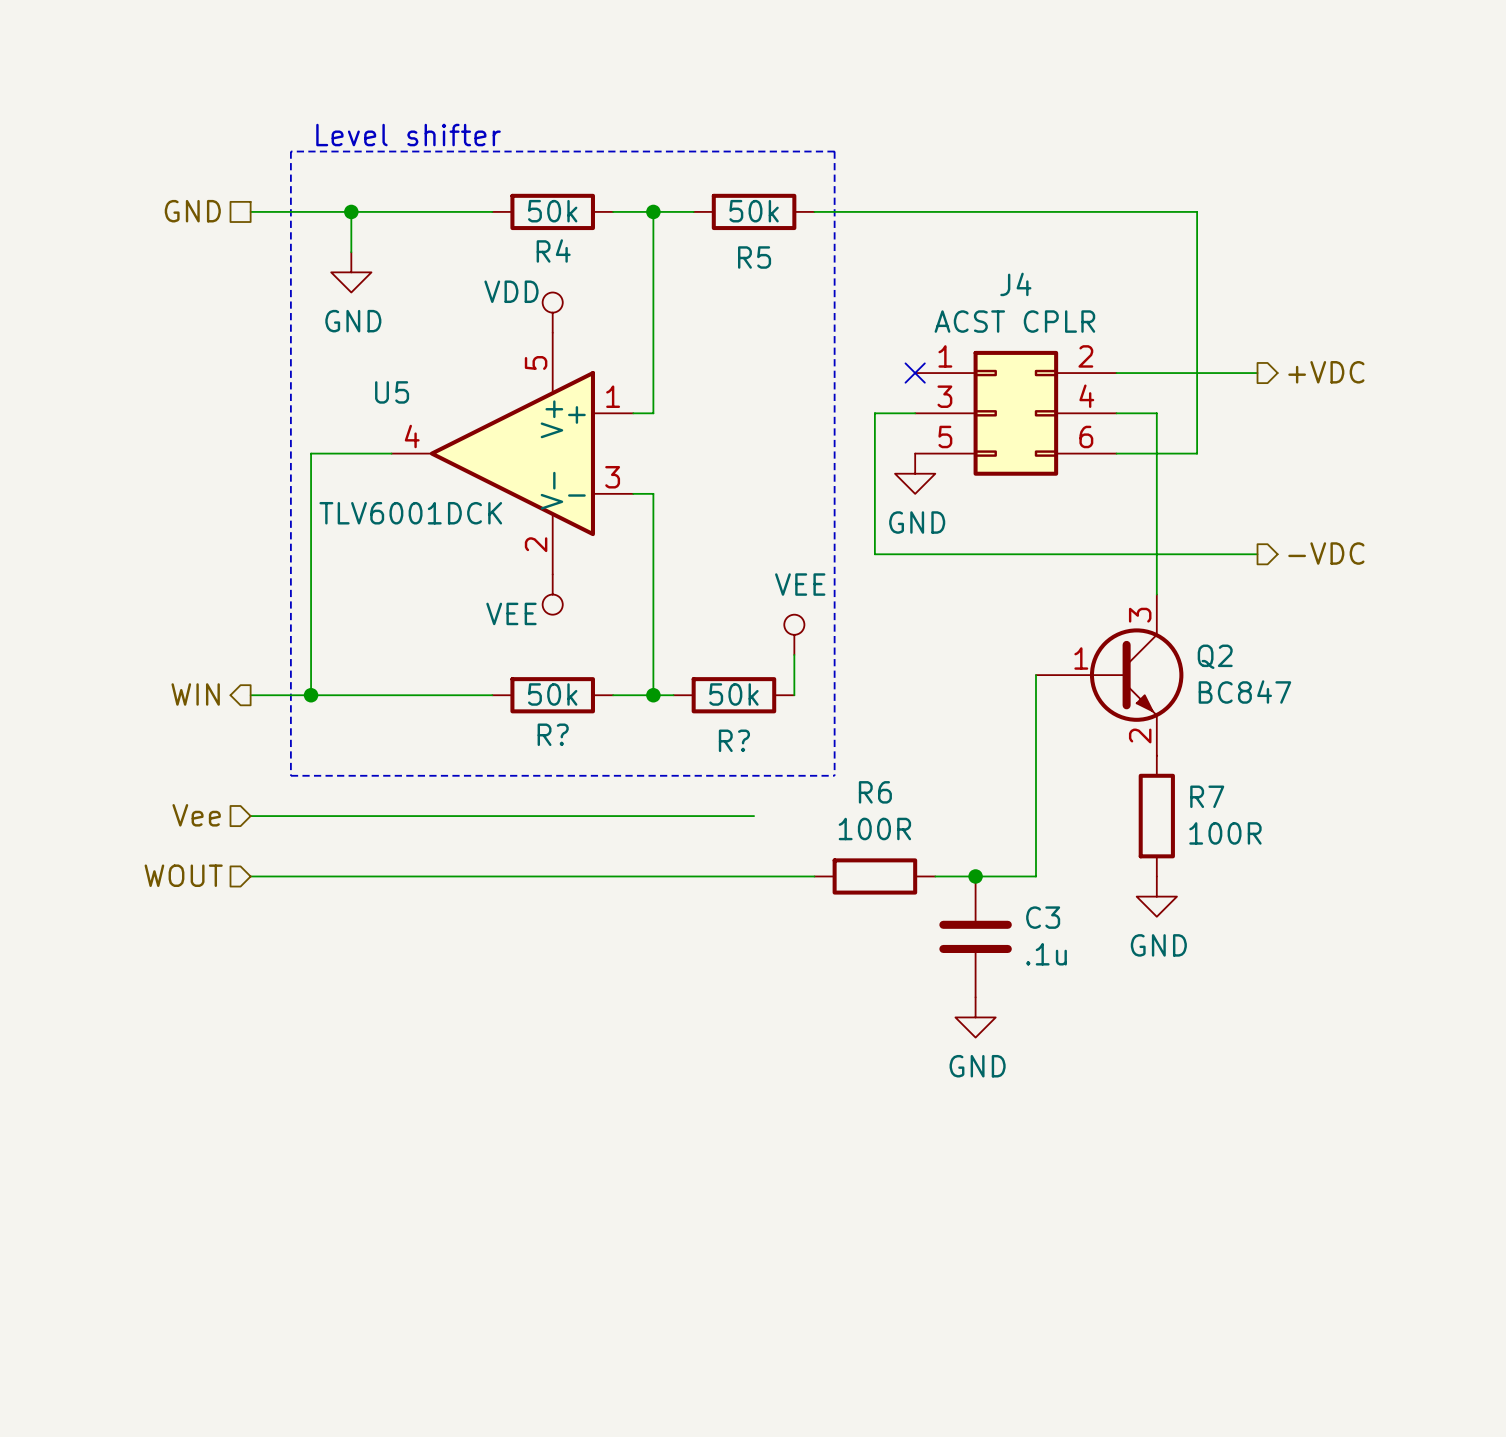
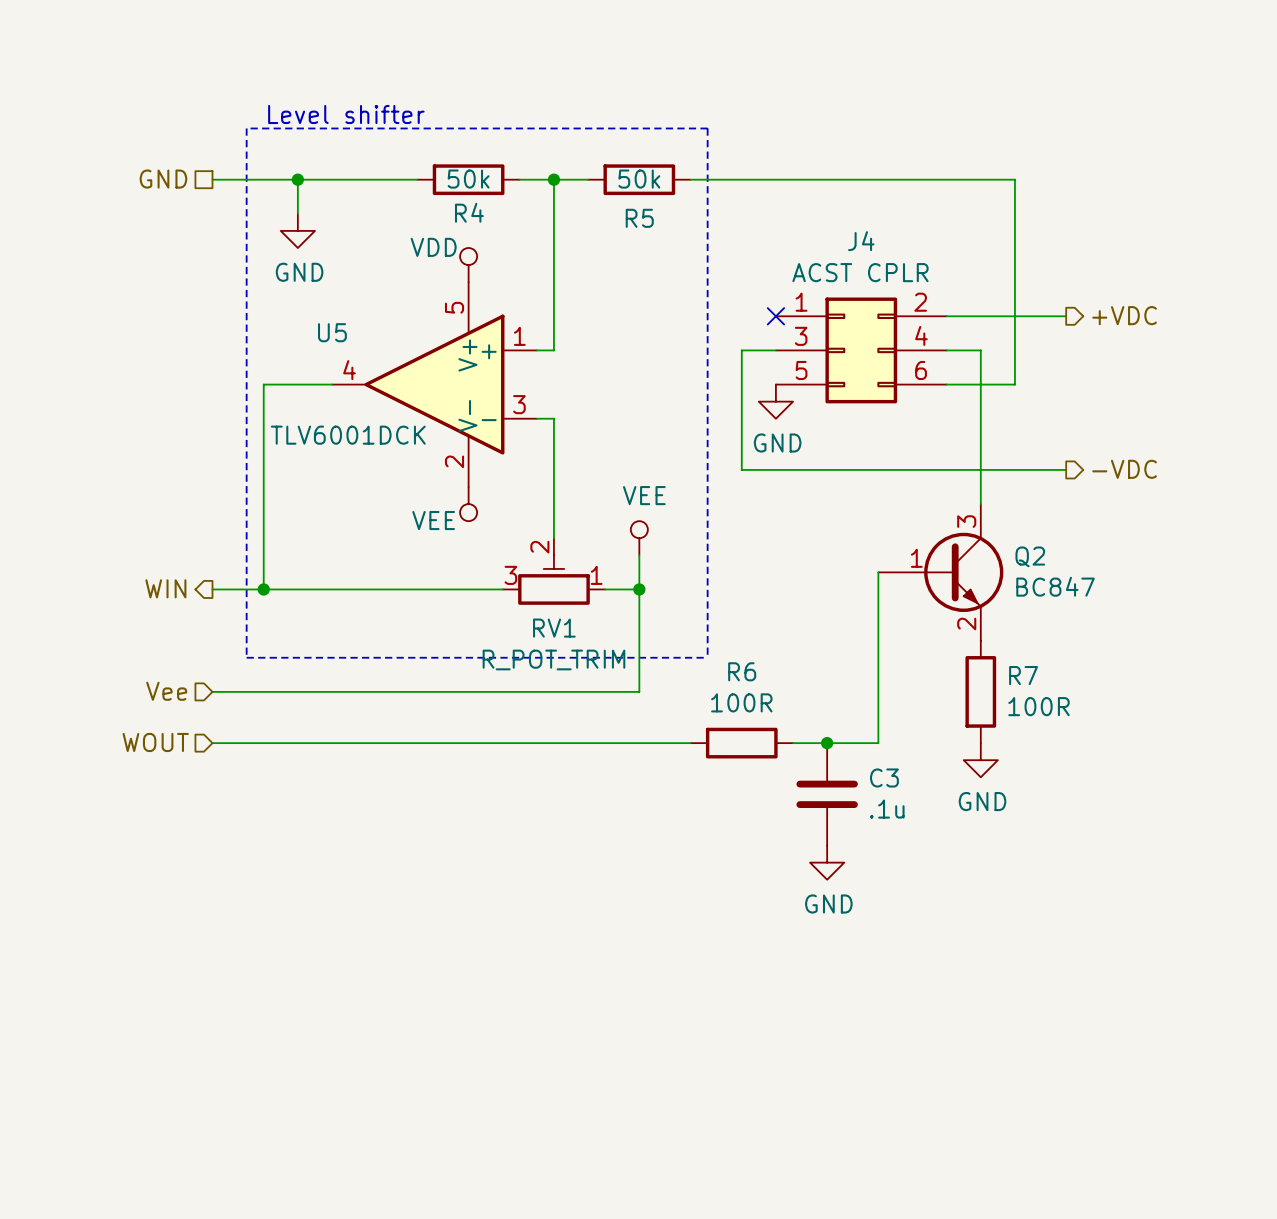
power symbol position: VEE (794, 634) -> VEE (639, 538)
wire: none -> (639, 555) (639, 691)
wire: (794, 654) (794, 695) -> none
RV1: none -> R_POT_TRIM (553, 571)
wire: none -> (417, 589) (502, 589)
R?: 50k (552, 695) -> none
wire: (613, 695) (673, 695) -> none
junction: (653, 695) -> none
wire: none -> (605, 589) (639, 589)
R?: 50k (733, 695) -> none
junction: none -> (639, 589)

